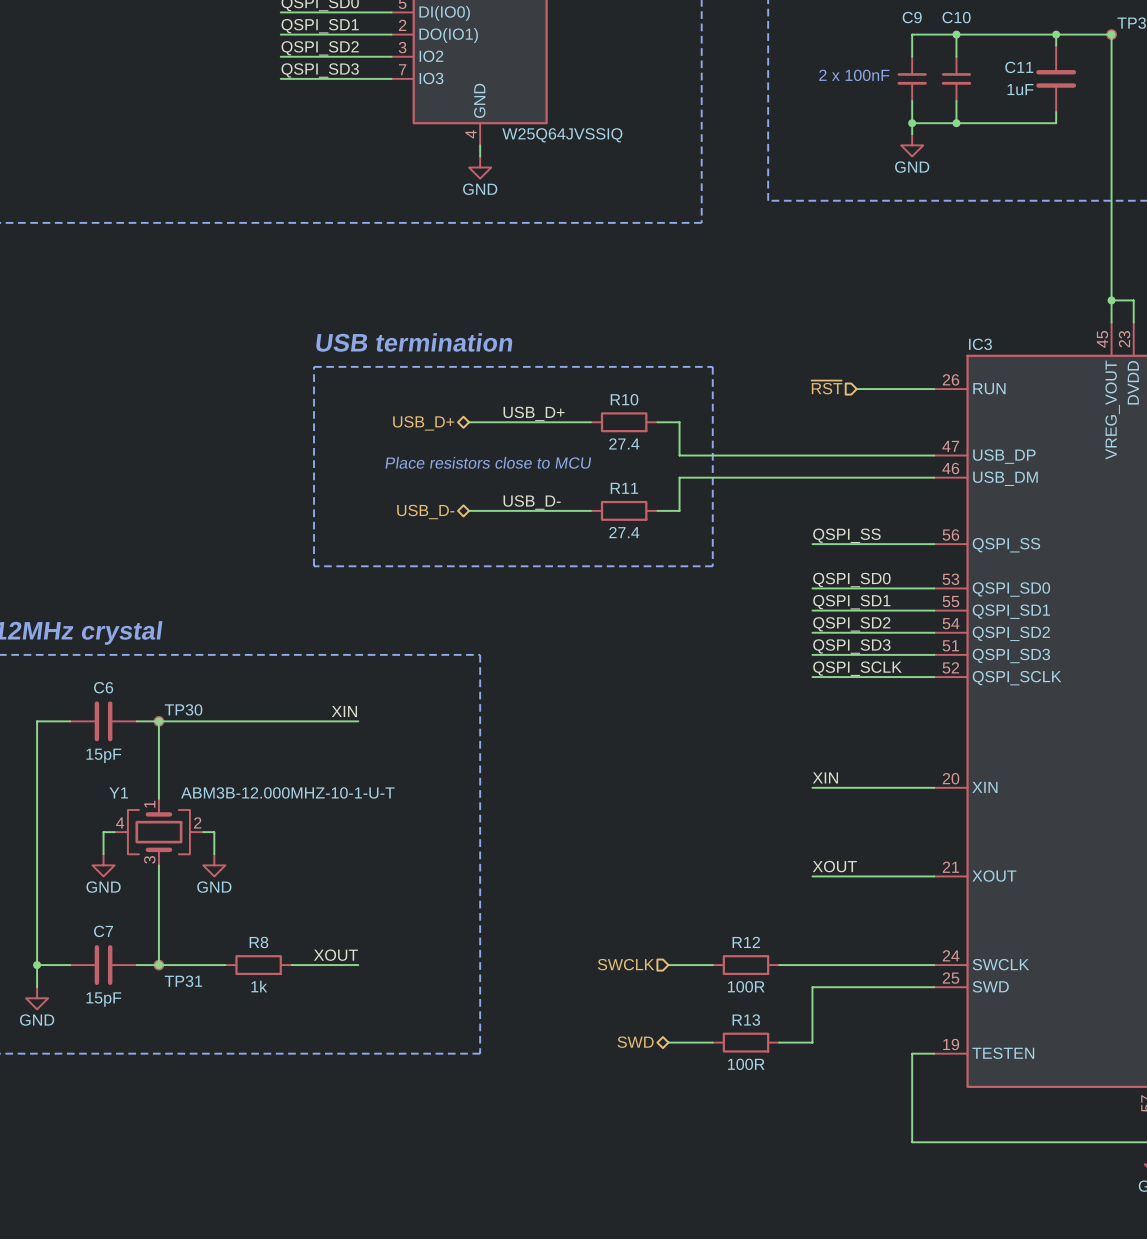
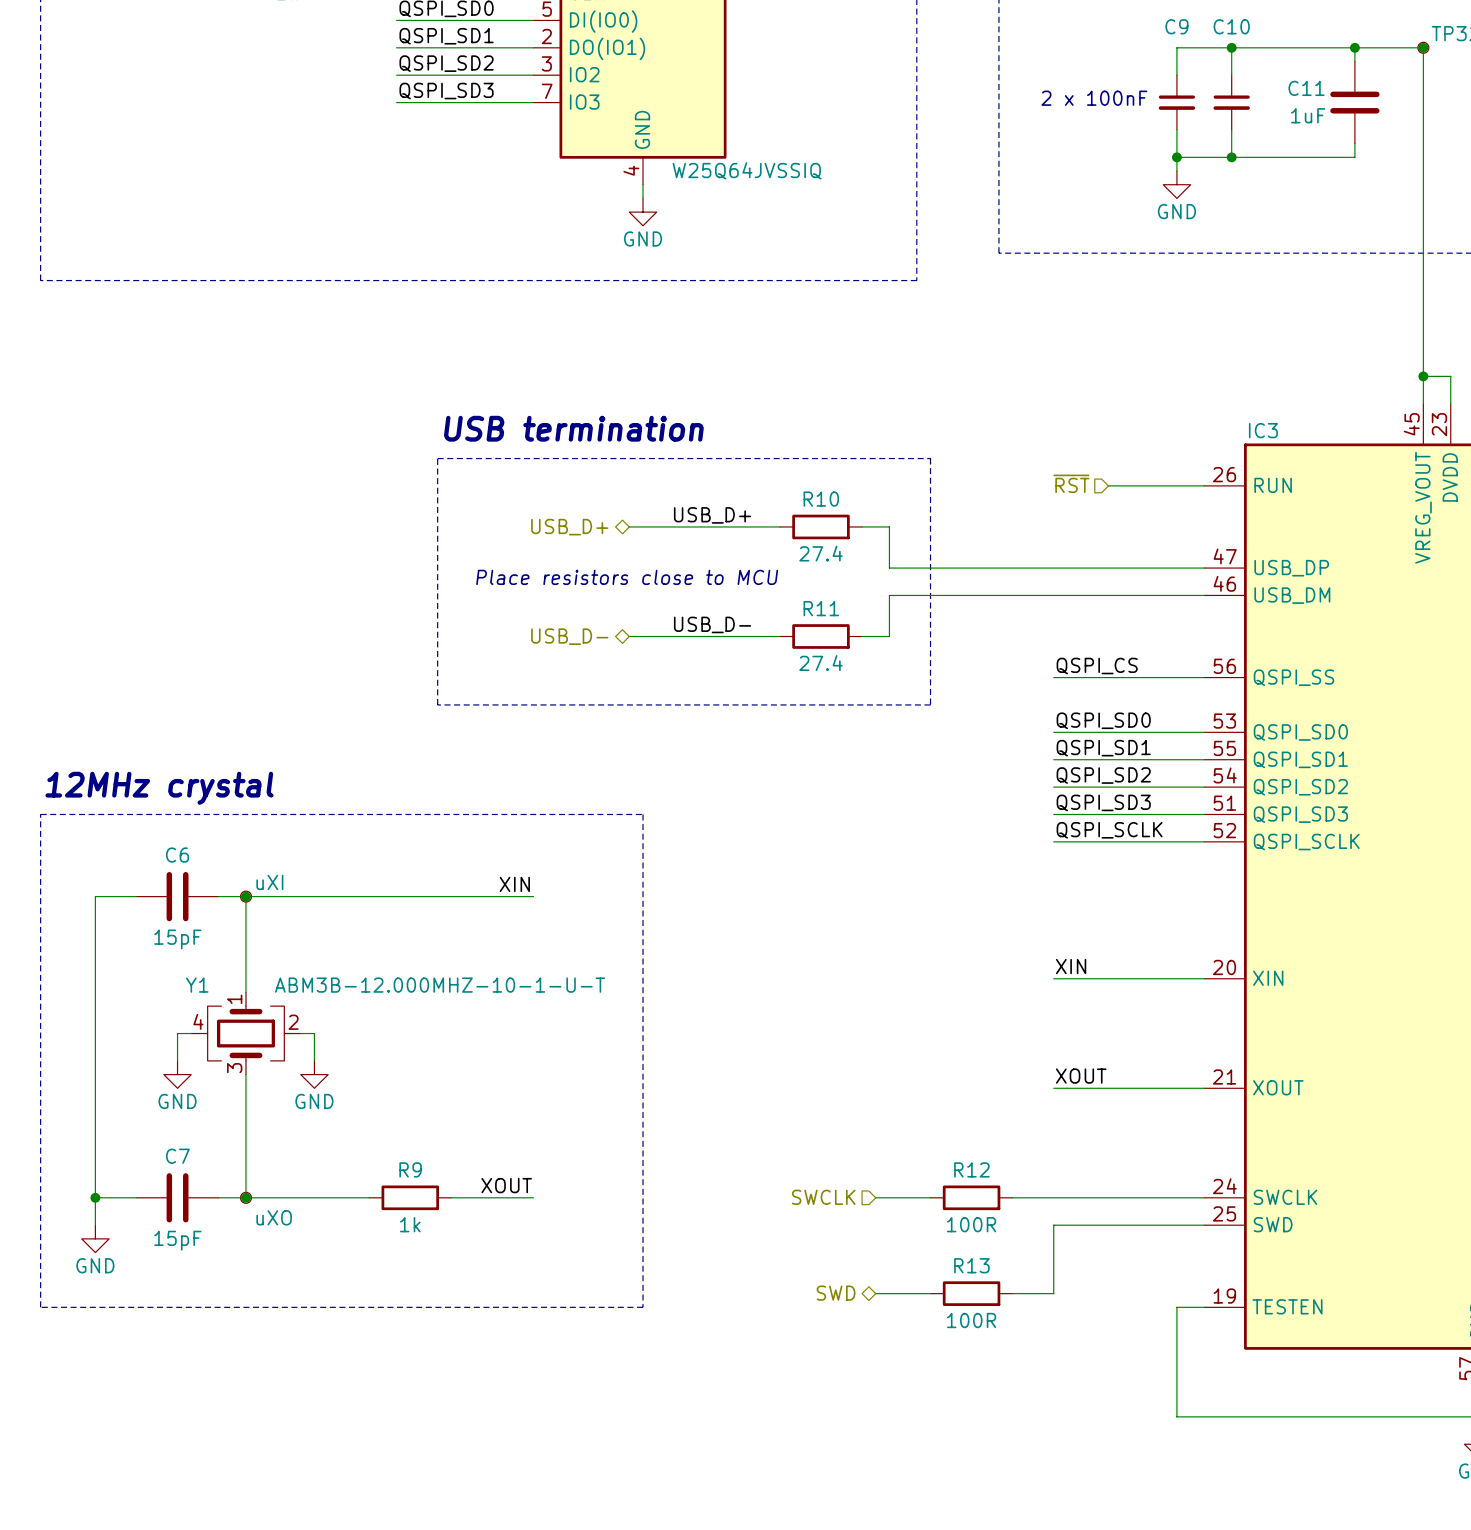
label: QSPI_SS (846, 535) -> QSPI_CS (1097, 666)
TP30 value: none -> uXI (269, 882)
TP30 name: TP30 (183, 709) -> none
label position: XIN (344, 711) -> XIN (514, 884)
wire: none -> (492, 896) (533, 896)
label position: XOUT (335, 955) -> XOUT (506, 1185)
R8: 1k (258, 965) -> none
wire: (291, 965) (325, 965) -> (328, 1197) (369, 1197)
R9: none -> 1k (410, 1197)
wire: none -> (492, 1197) (533, 1197)
TP31 value: none -> uXO (274, 1217)
TP31 name: TP31 (183, 981) -> none

